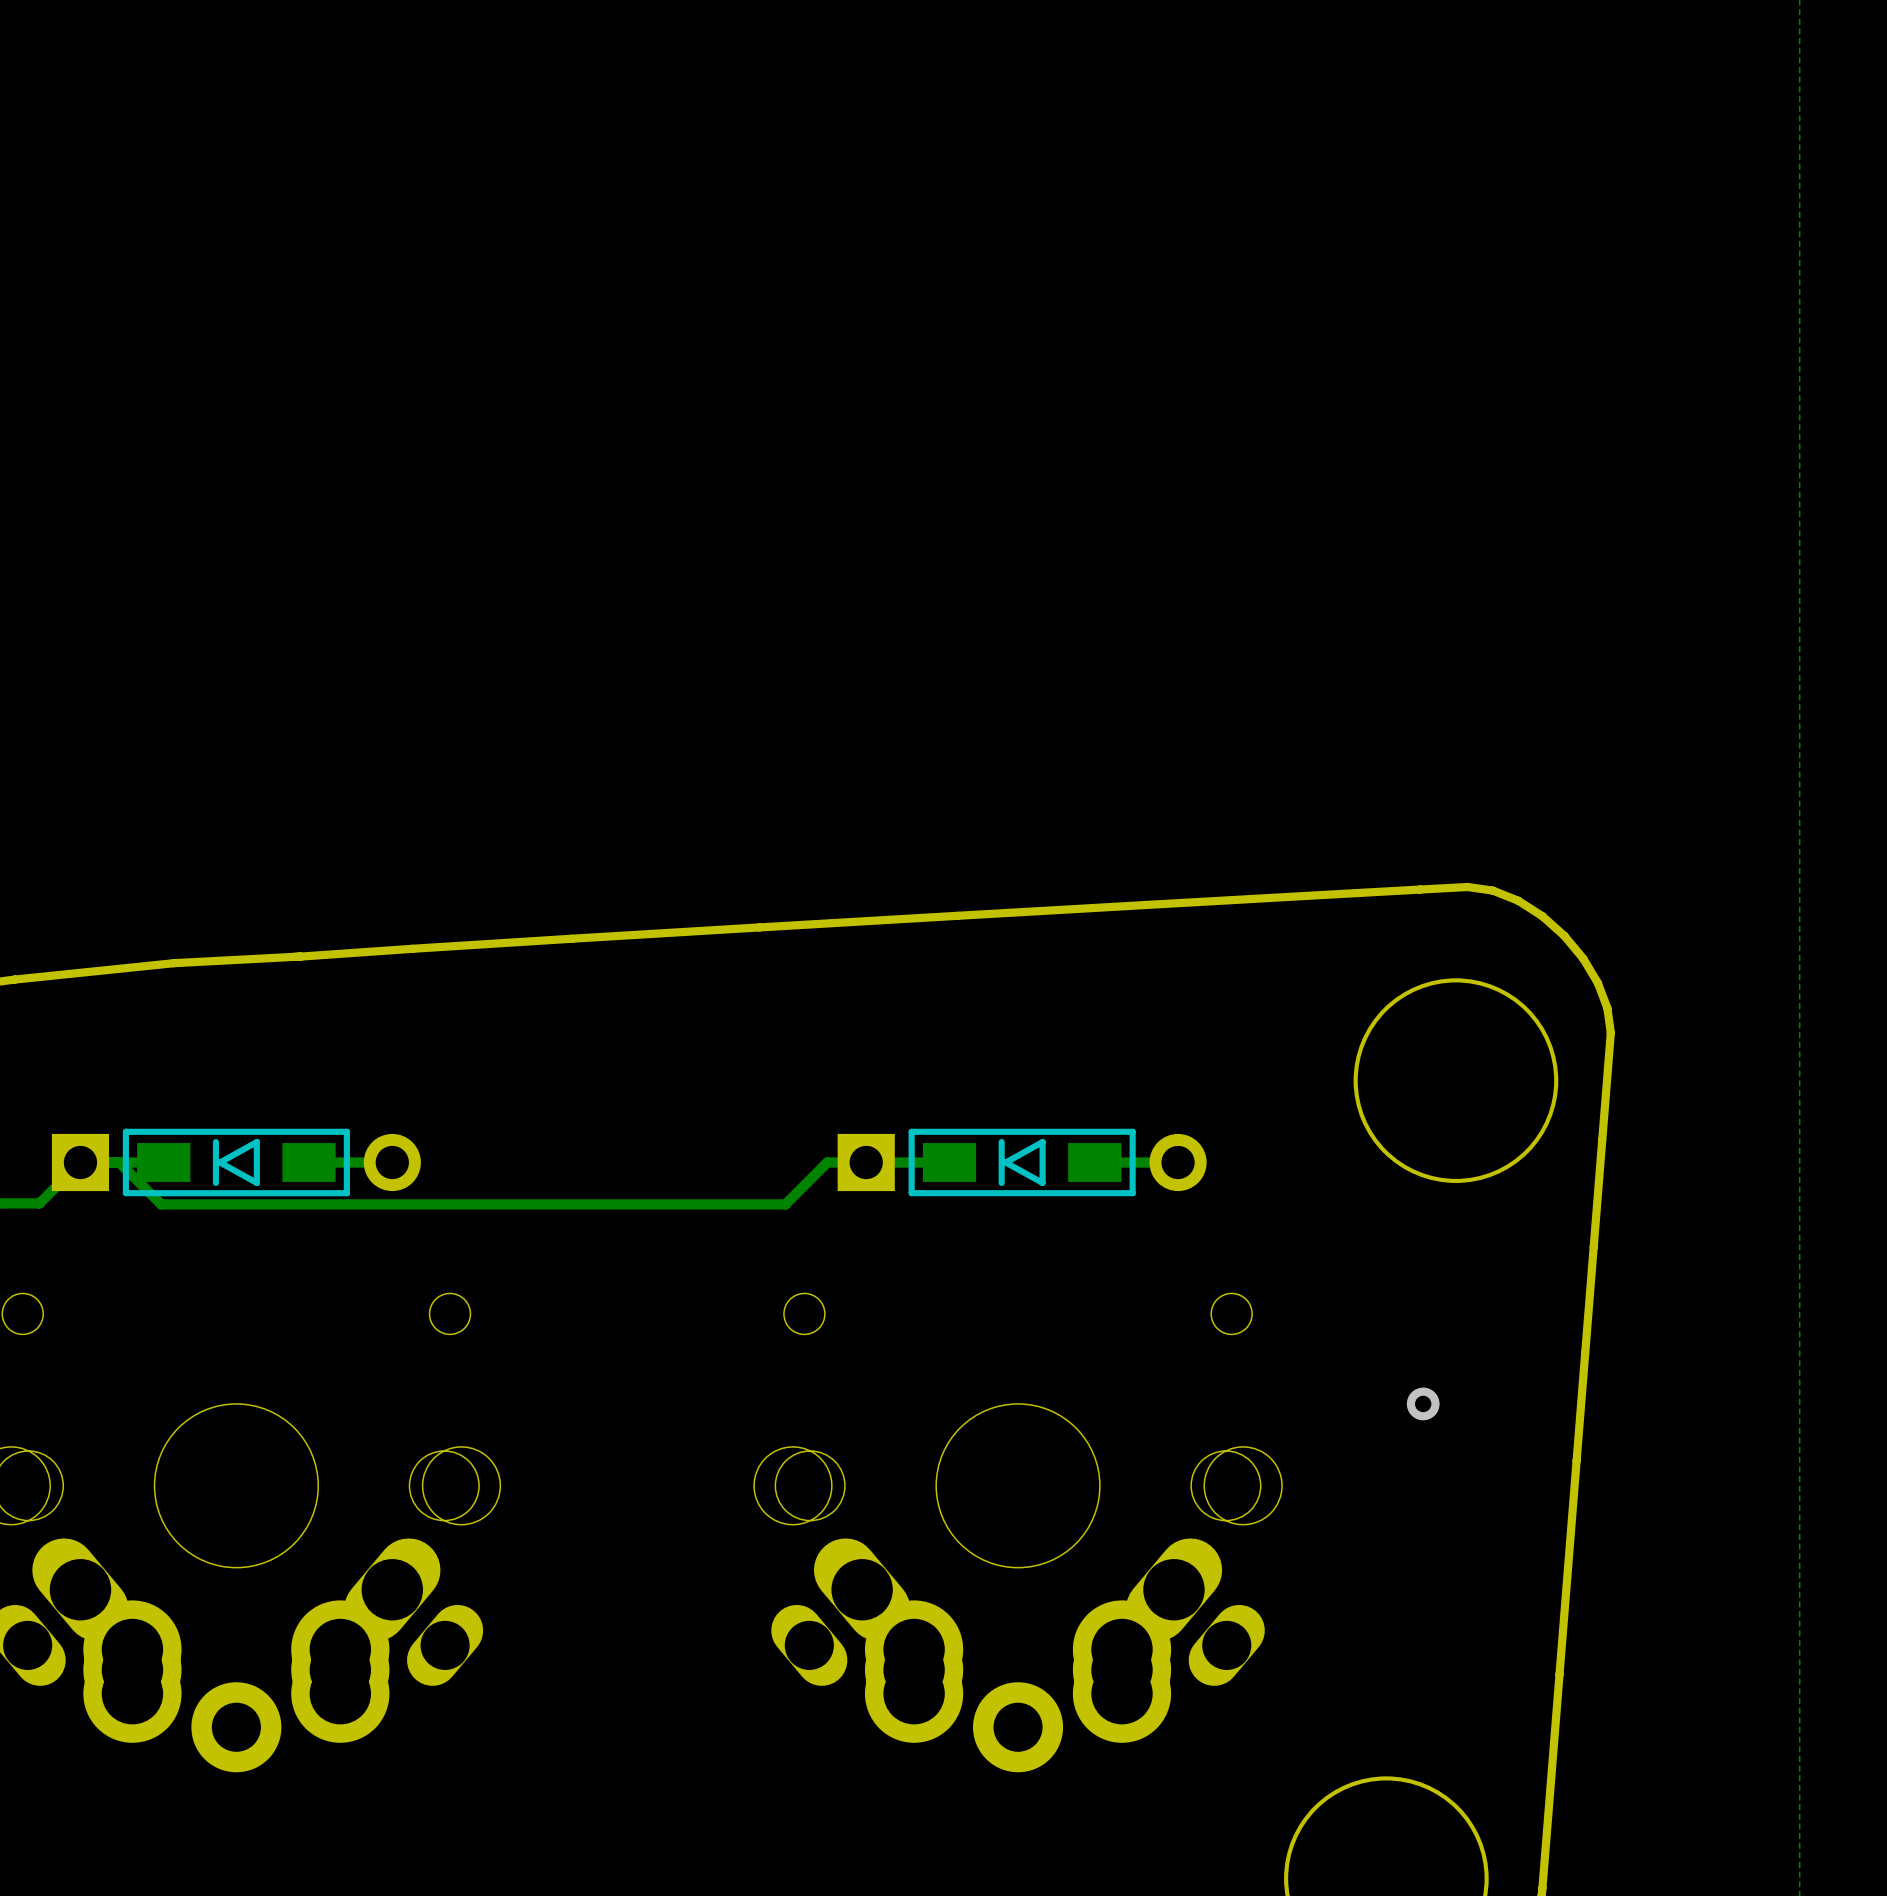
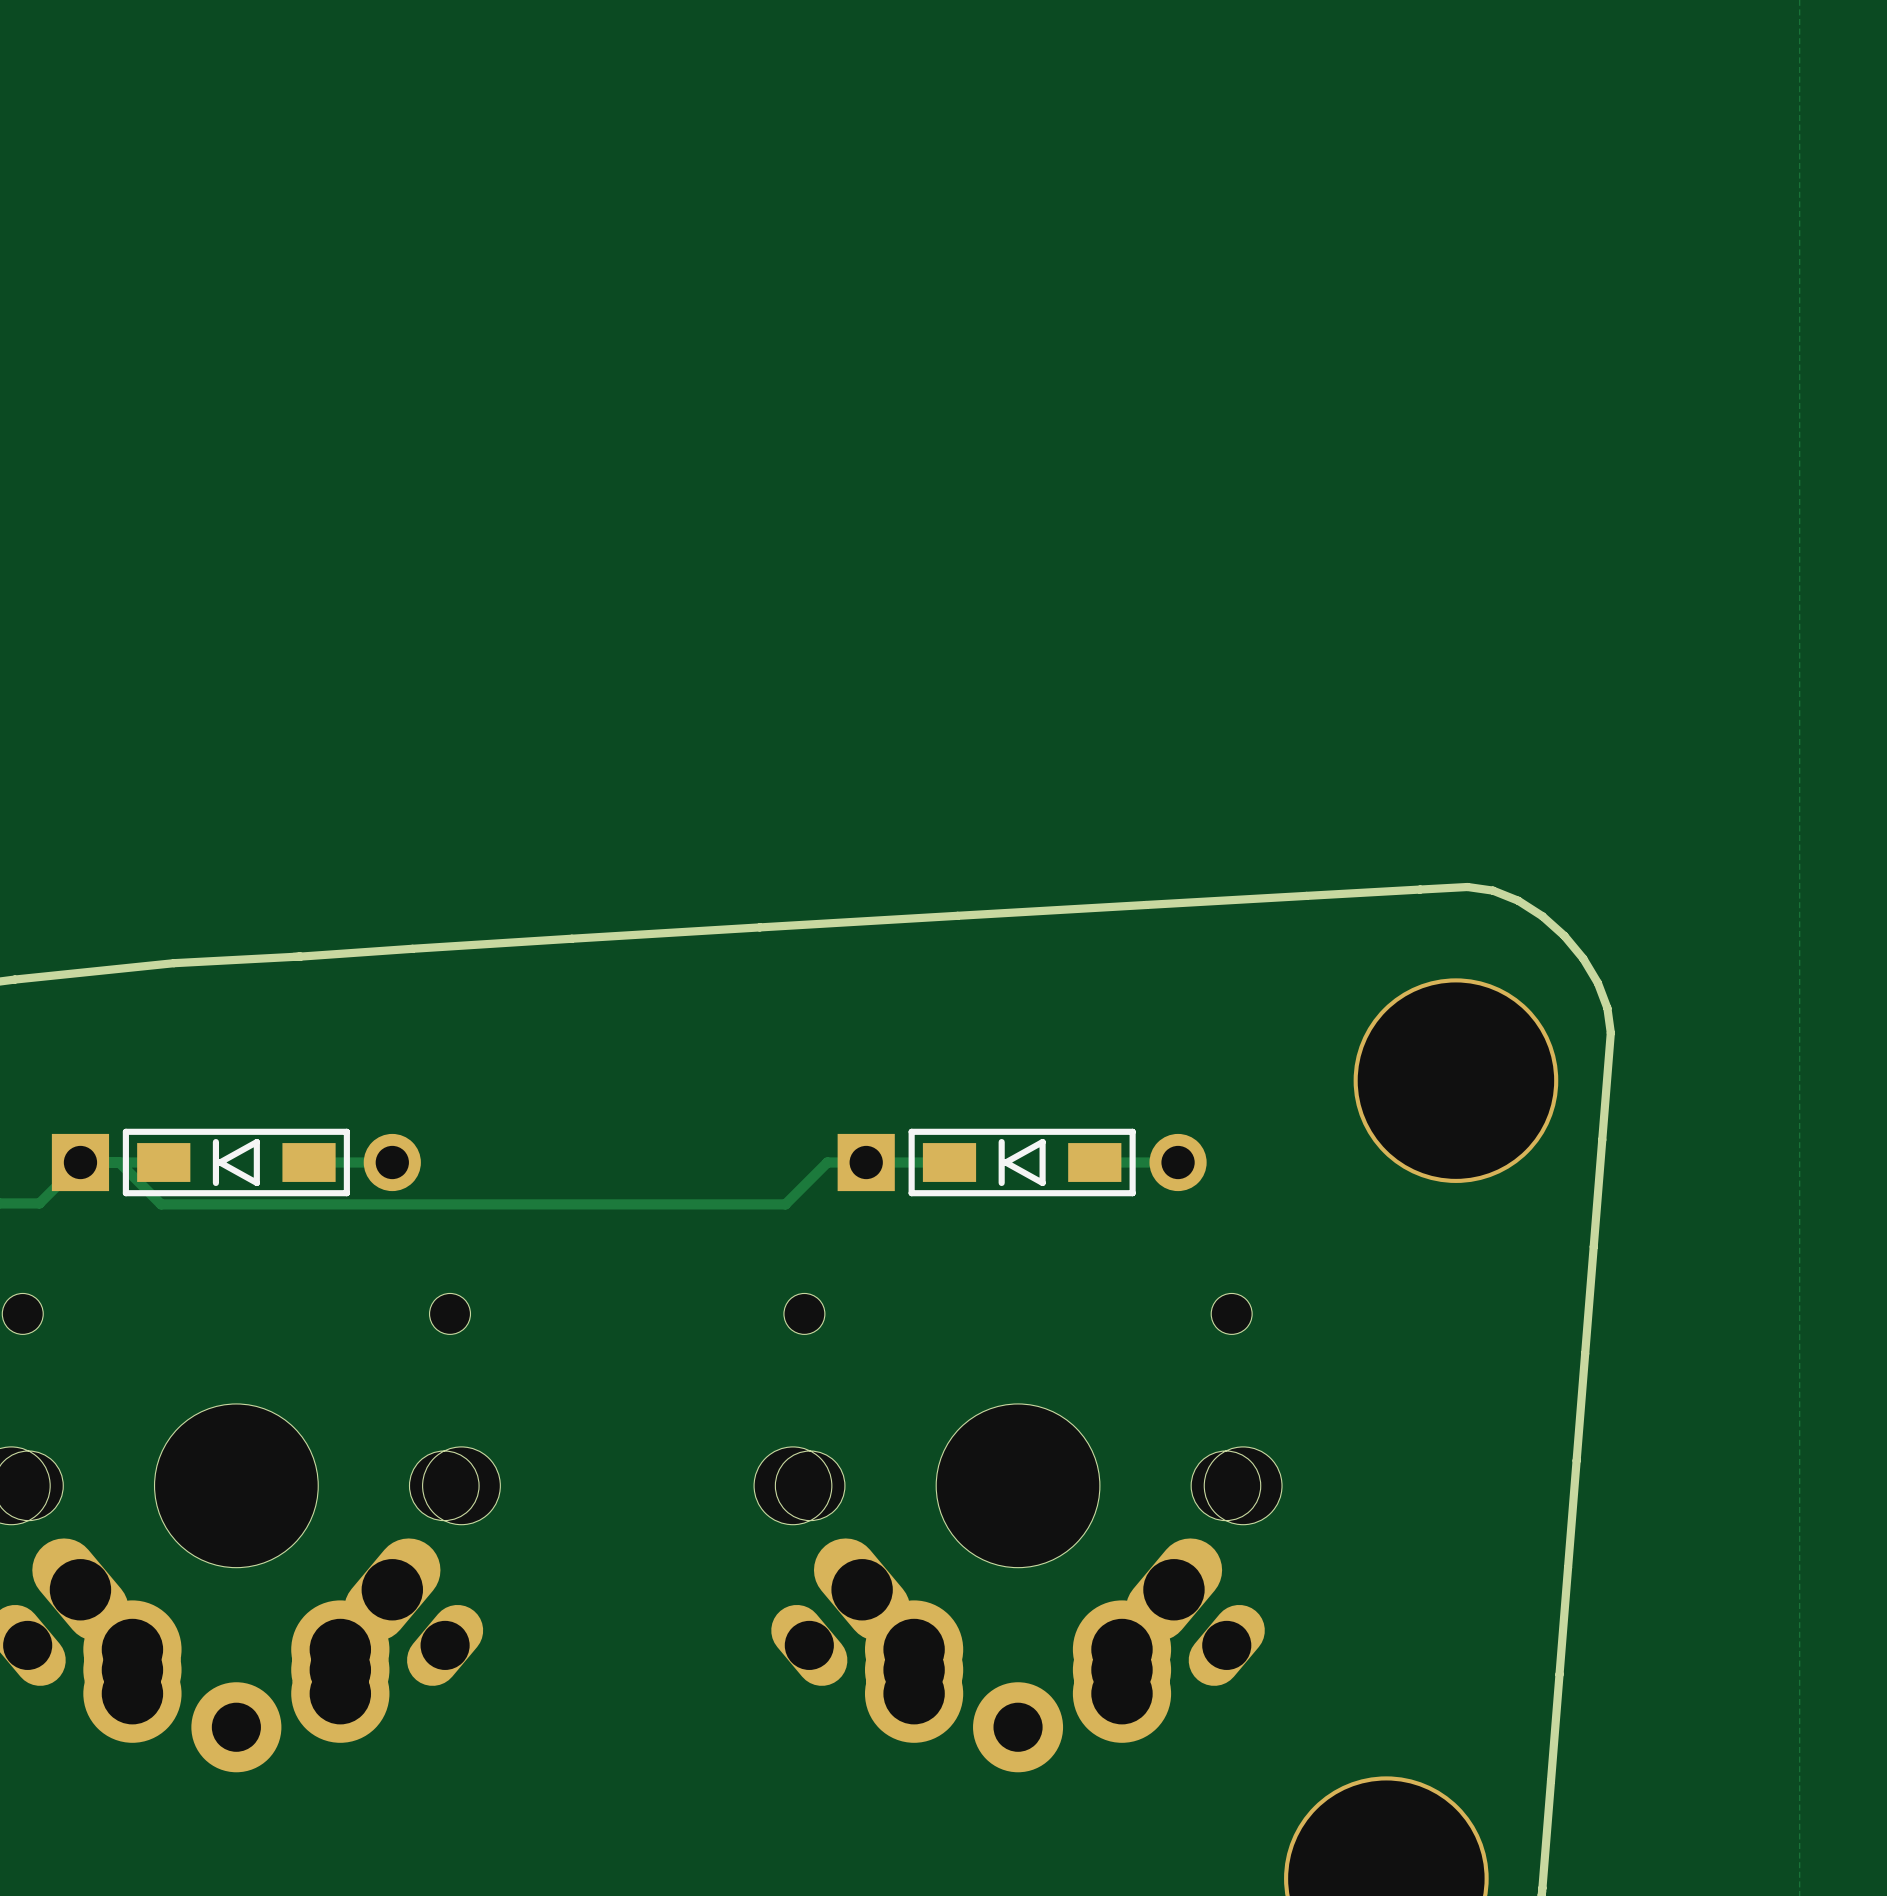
via: (1423, 1403) -> none

